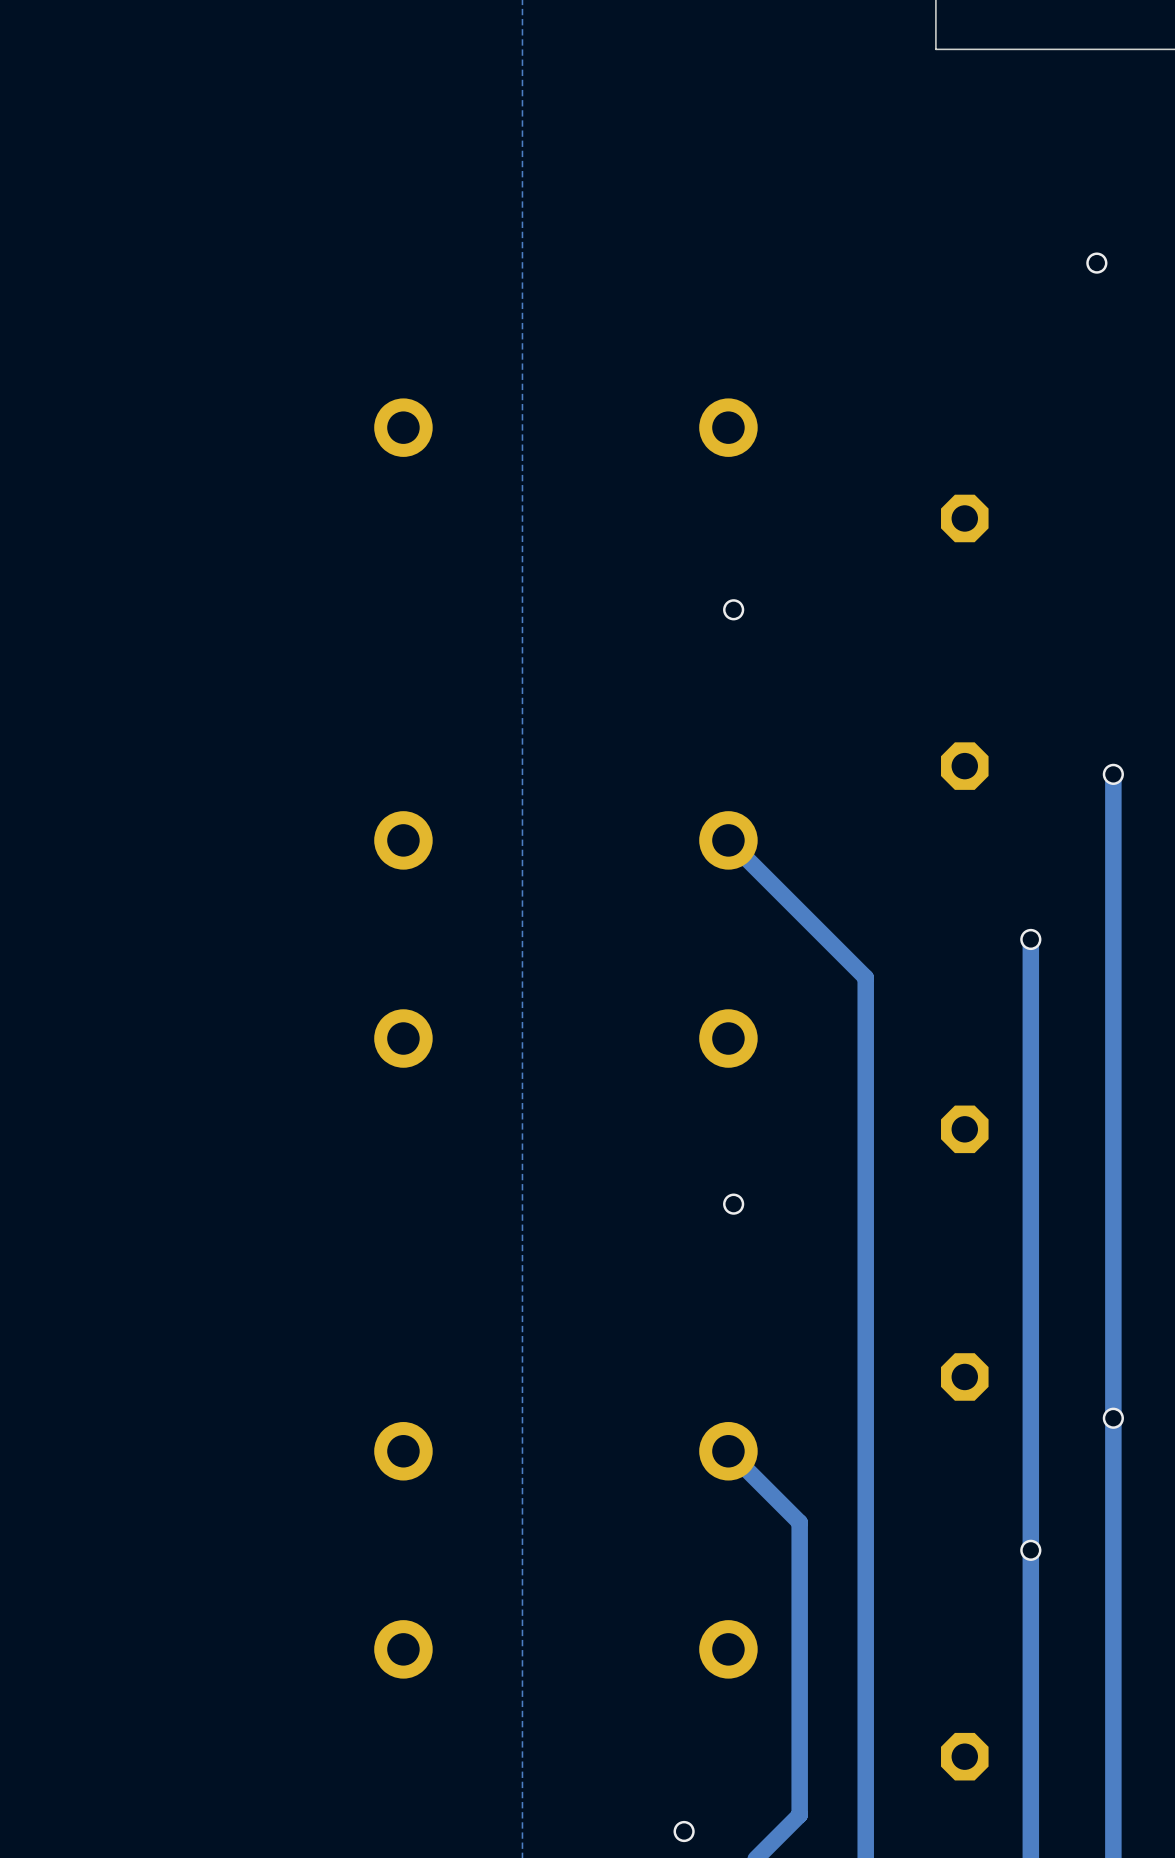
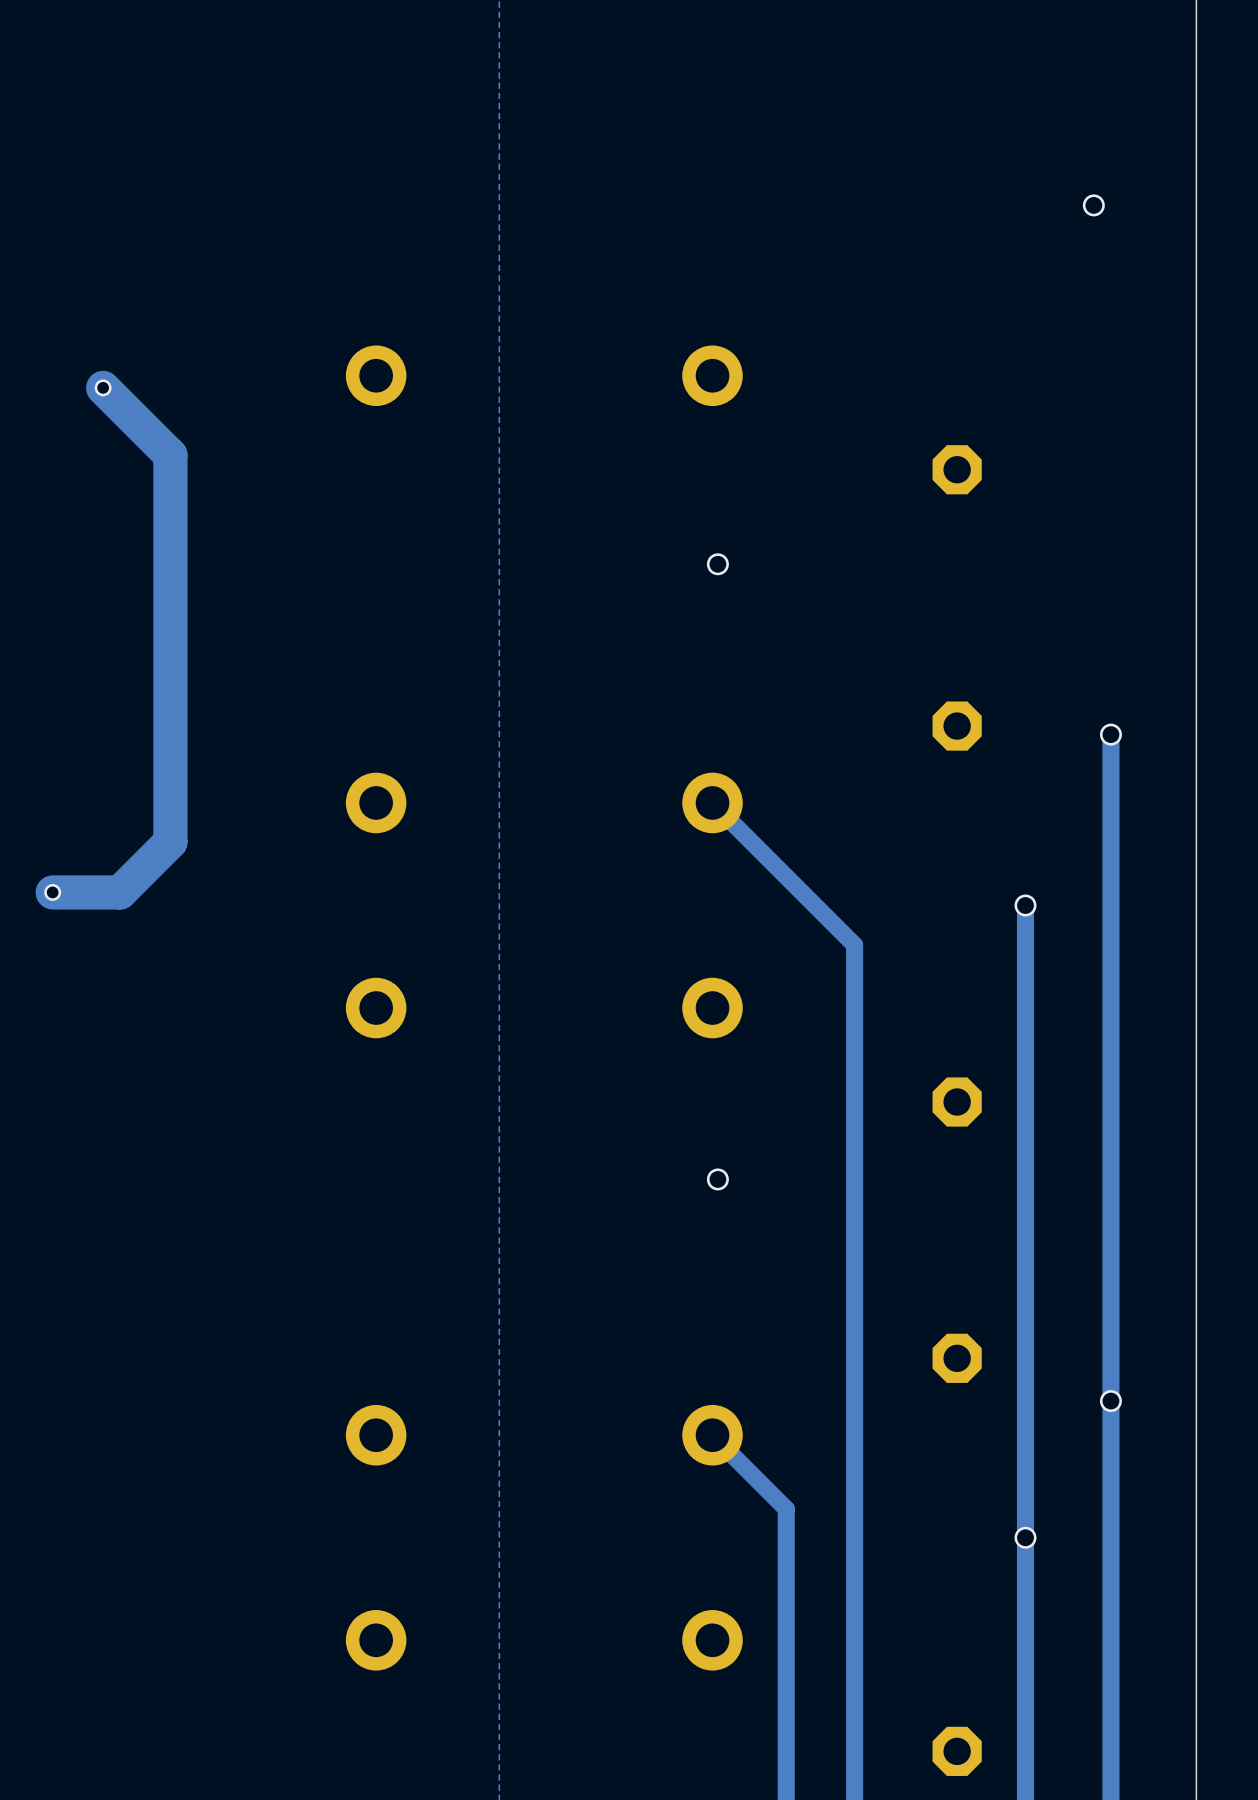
track: none -> (103, 387) (170, 455) (170, 841) (119, 892) (52, 892)
via: none -> (103, 387)
via: none -> (52, 892)

